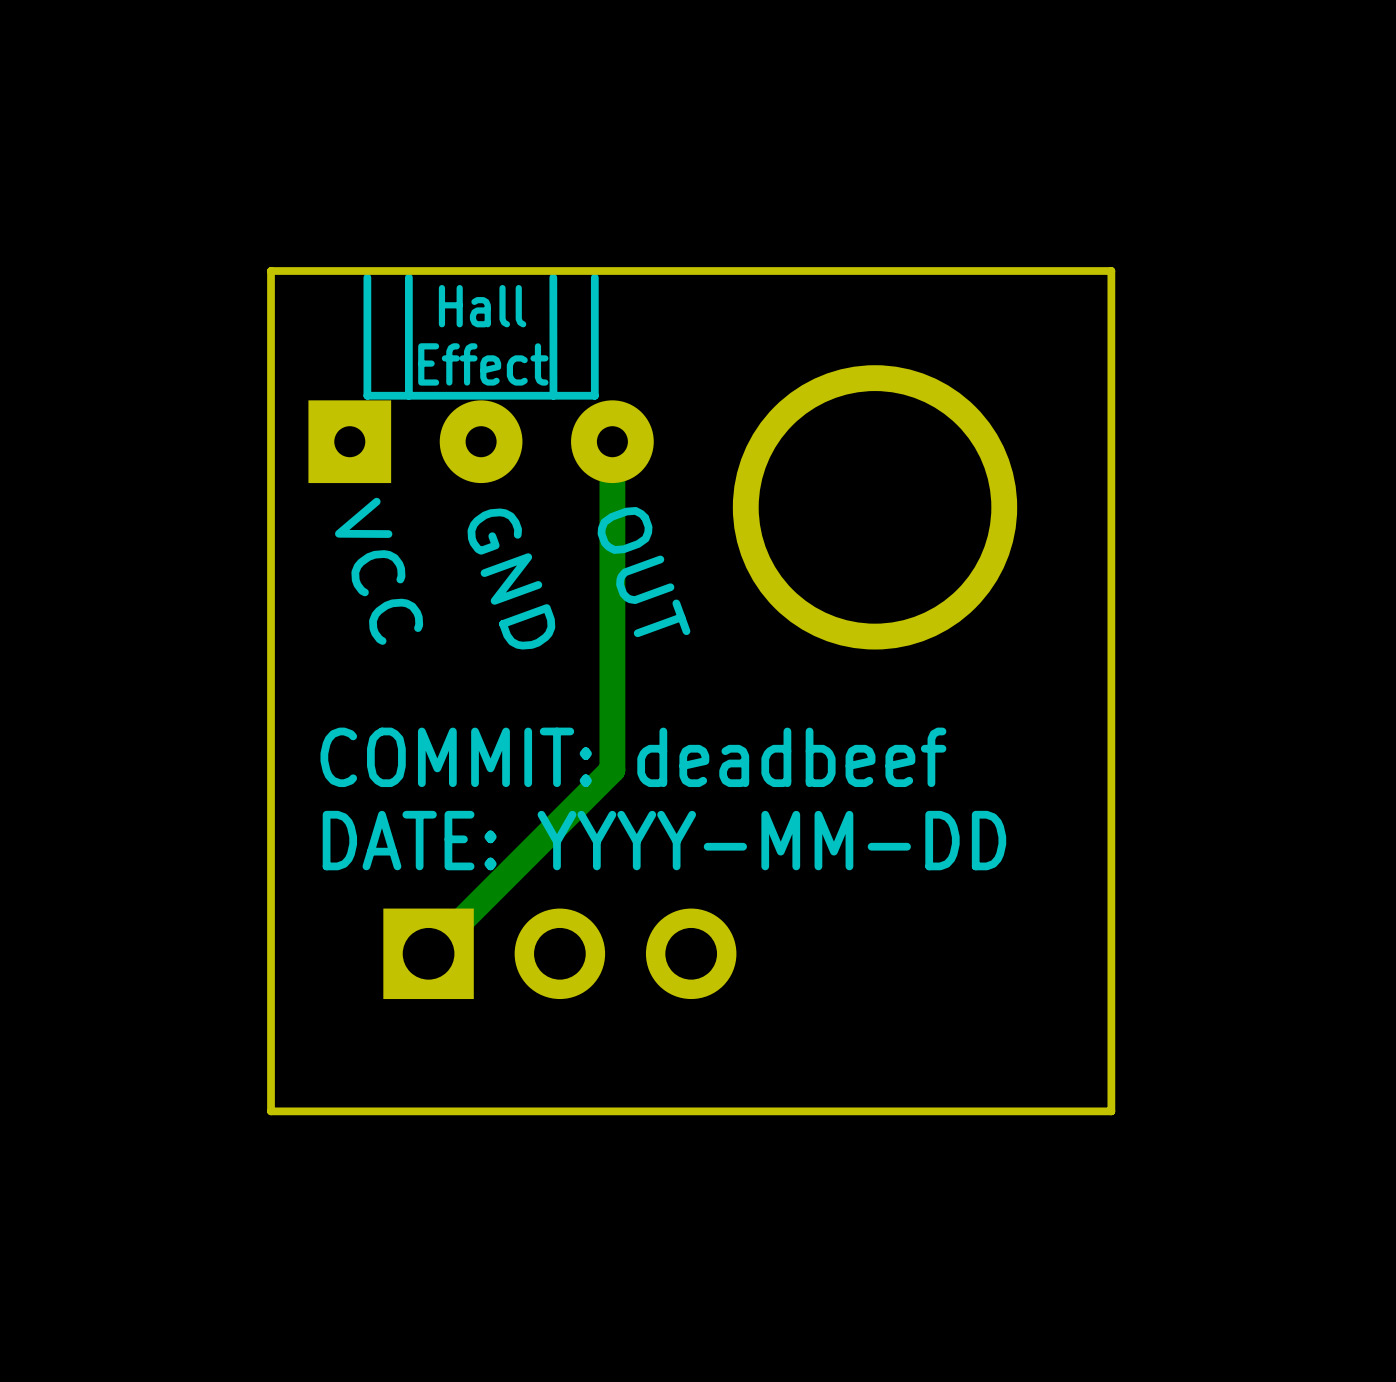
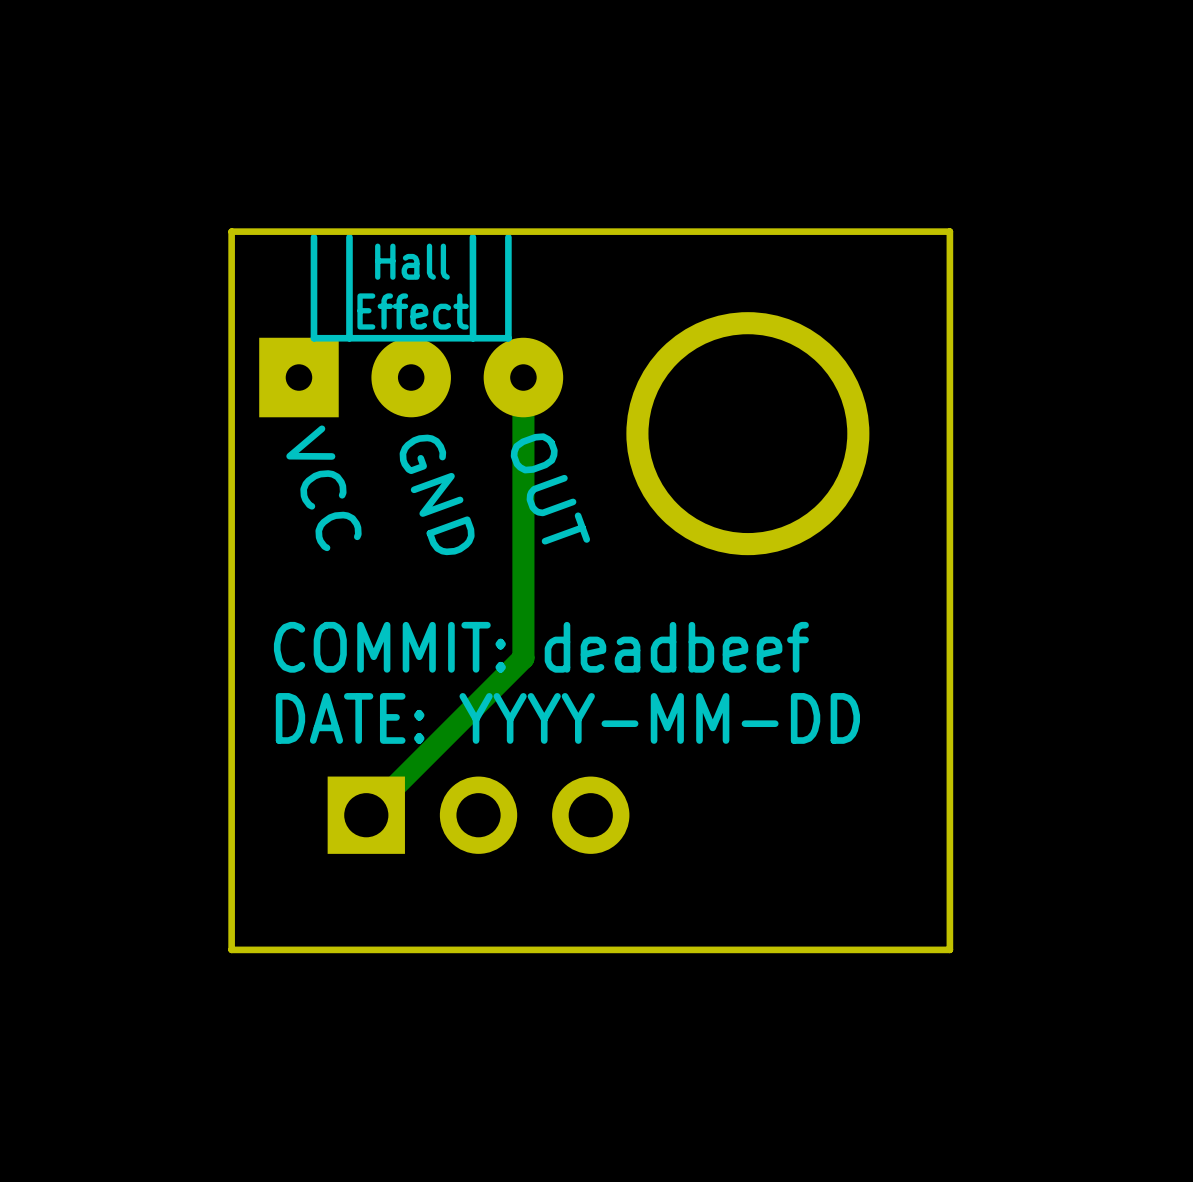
part footprint: [308, 273, 654, 484] -> [259, 233, 564, 418]

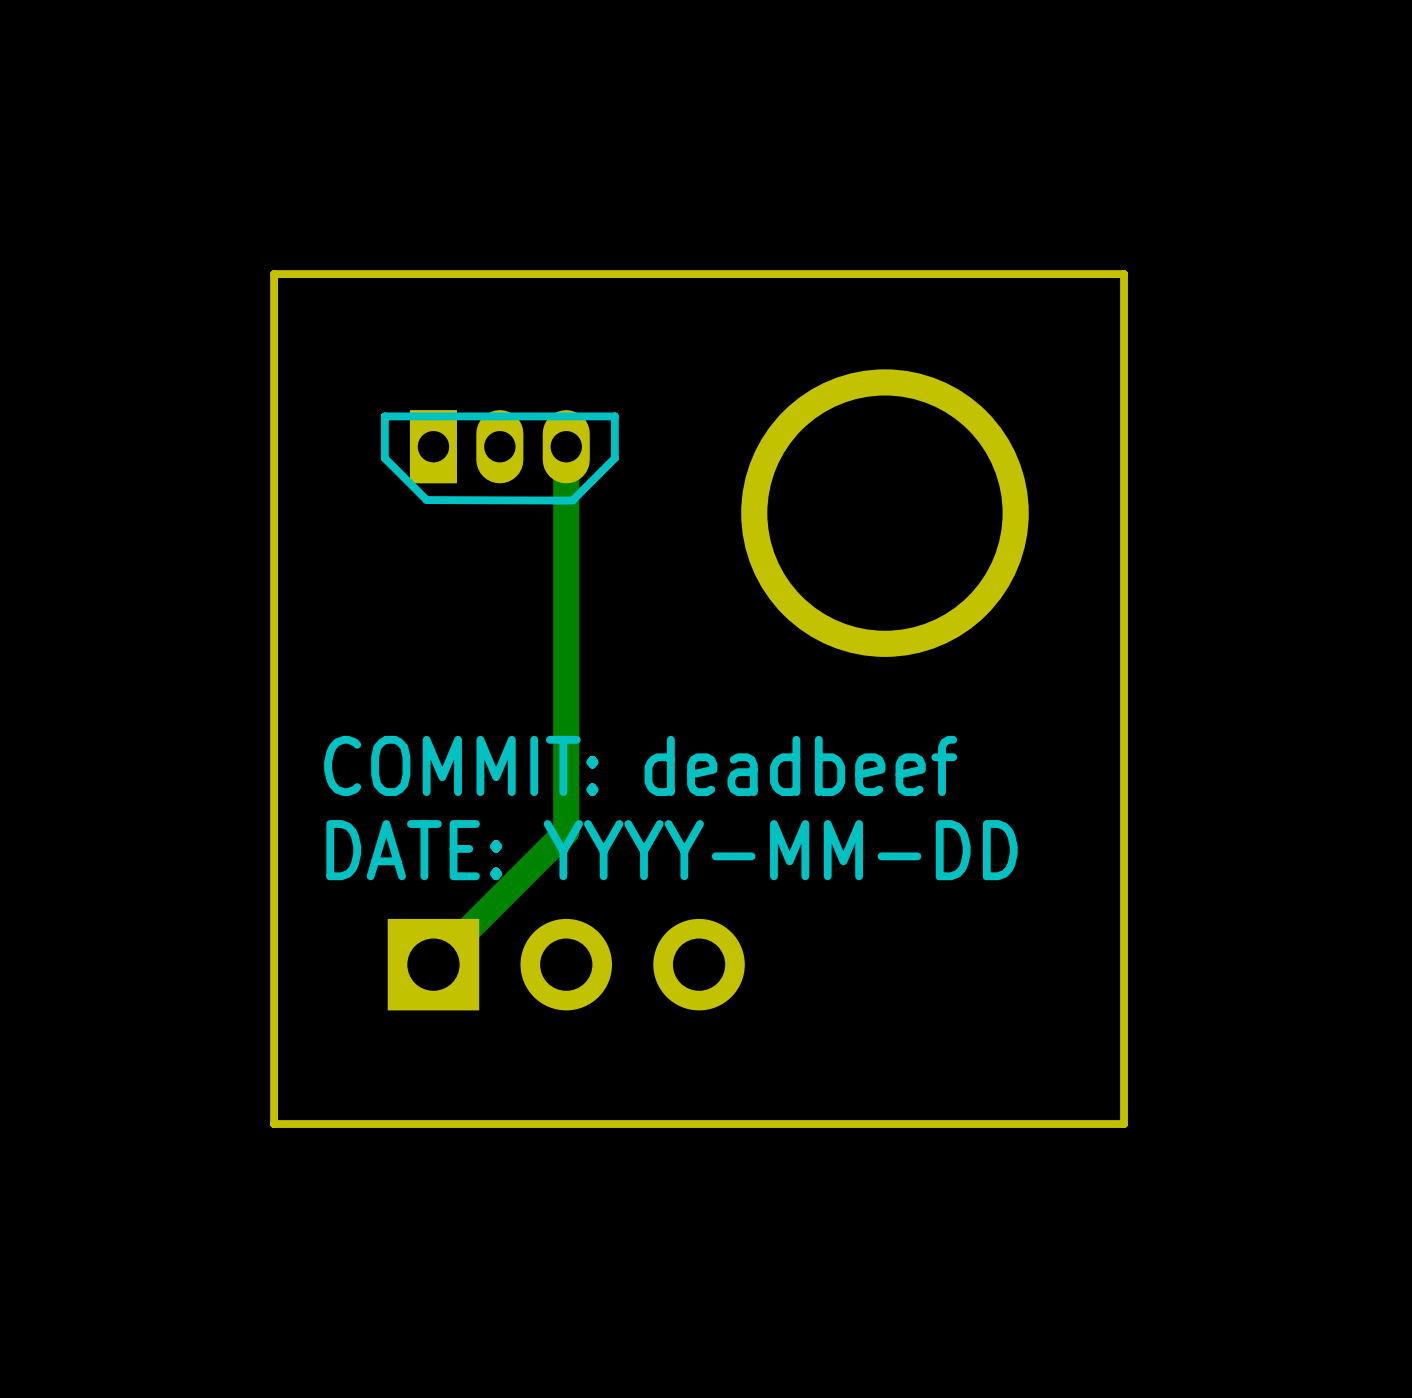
text: Hall (412, 261) -> none
text: Effect (413, 311) -> none
part: (411, 325) -> none
track: (523, 377) (523, 658) (478, 702) -> (566, 446) (566, 831)
part: none -> (499, 457)
text: VCC (323, 488) -> none
text: OUT (550, 488) -> none
text: GND (437, 494) -> none

